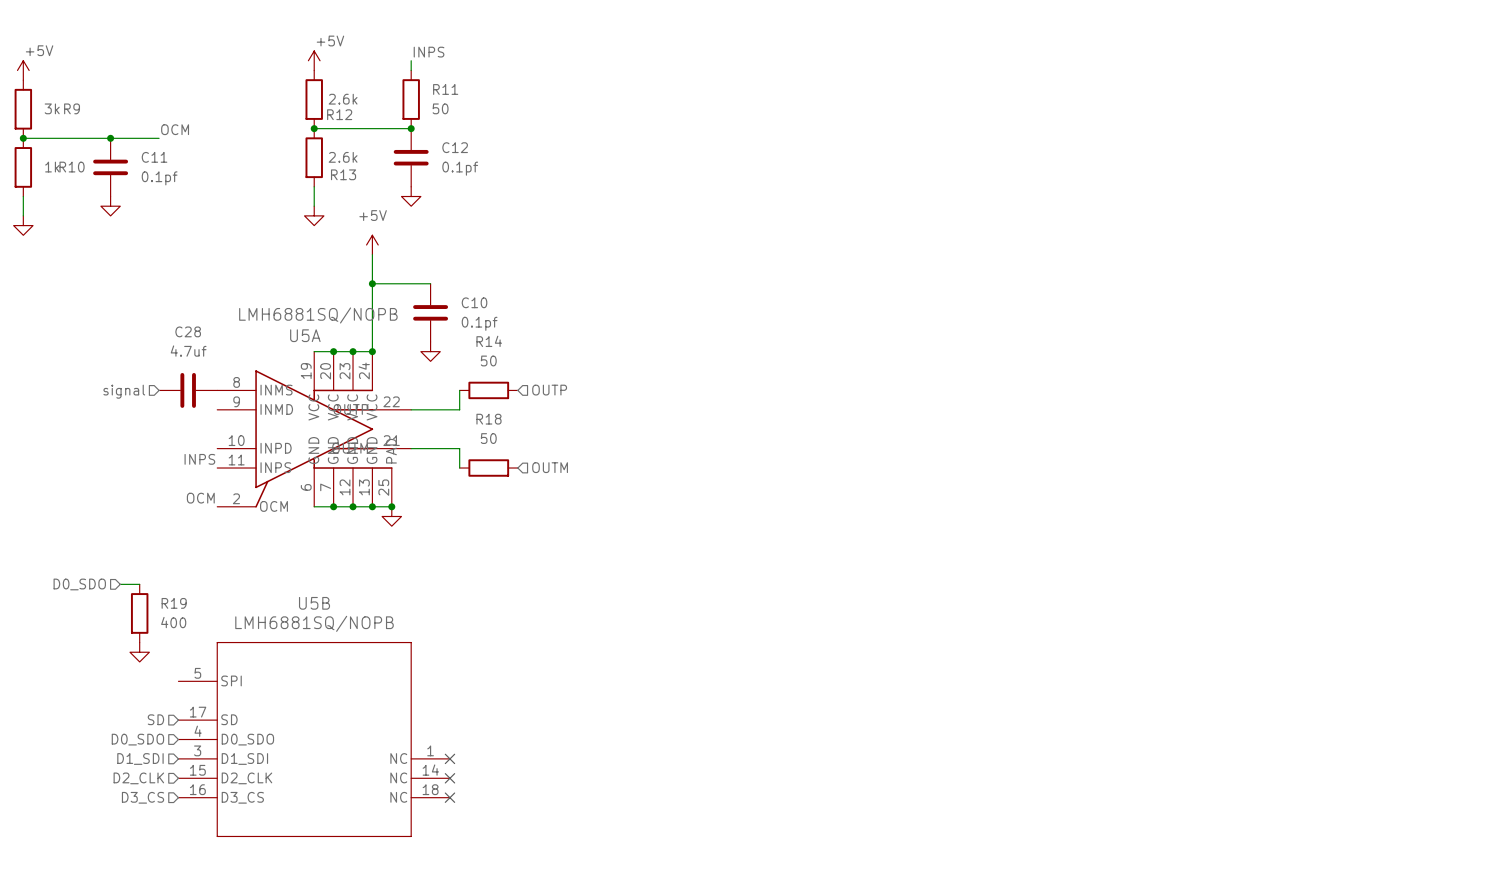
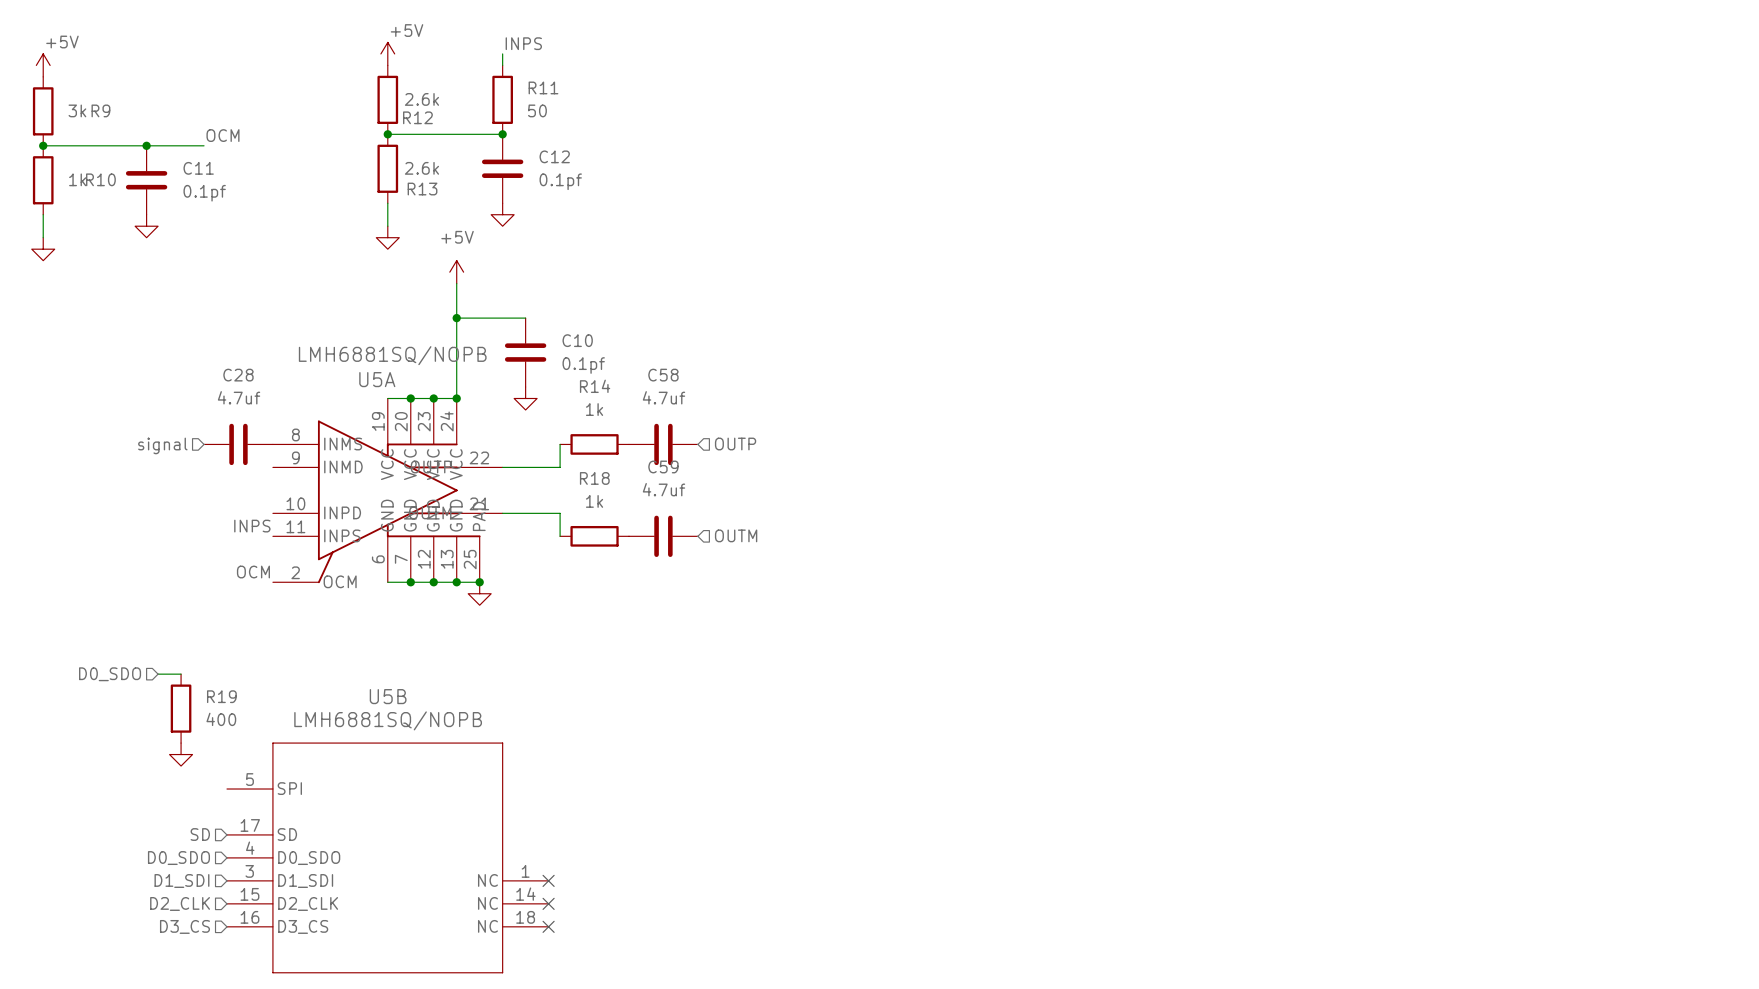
R14 value: 50 (488, 360) -> 1k (594, 409)
C58: none -> 4.7uf (663, 444)
hierarchical label position: OUTP (549, 390) -> OUTP (735, 444)
R18 value: 50 (488, 438) -> 1k (594, 501)
hierarchical label position: OUTM (550, 467) -> OUTM (736, 535)
C59: none -> 4.7uf (663, 536)

